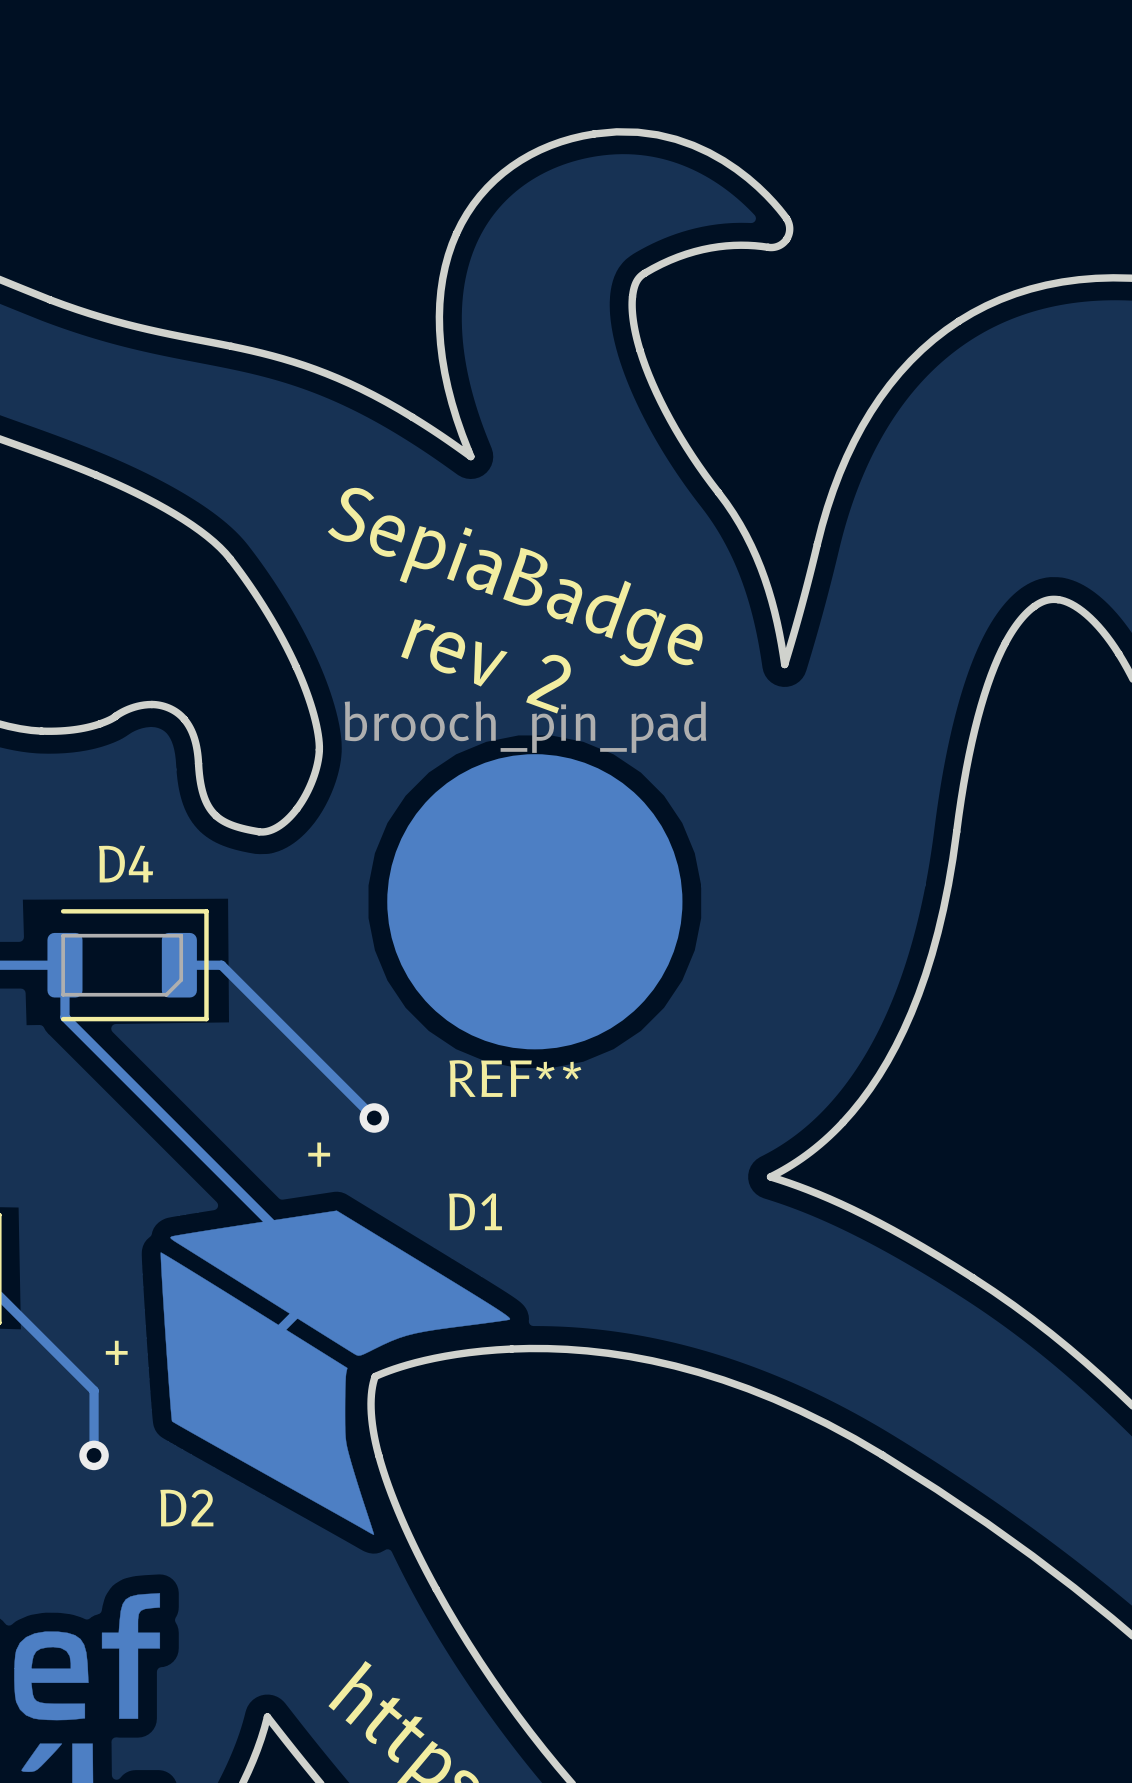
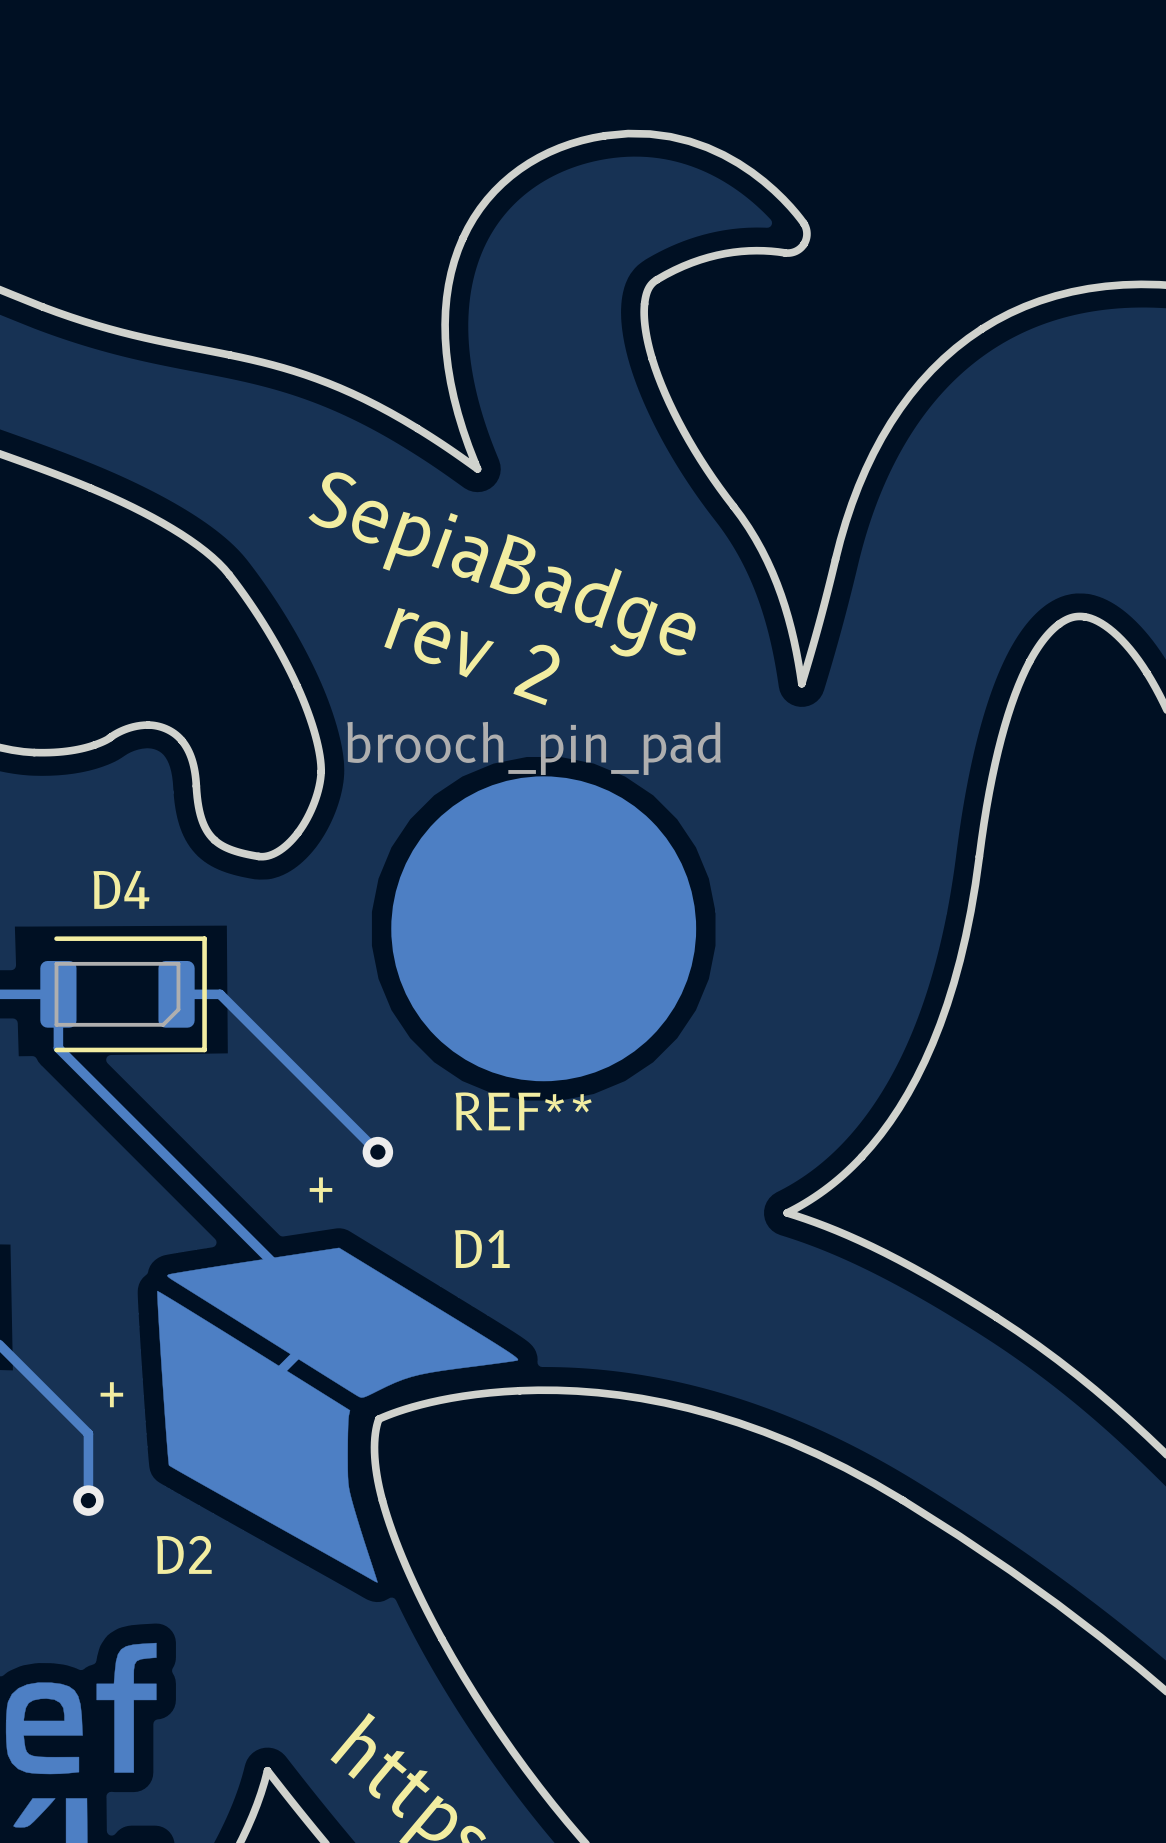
text position: SepiaBadge (515, 577) -> SepiaBadge (502, 564)
text position: rev 2 (486, 666) -> rev 2 (471, 656)

